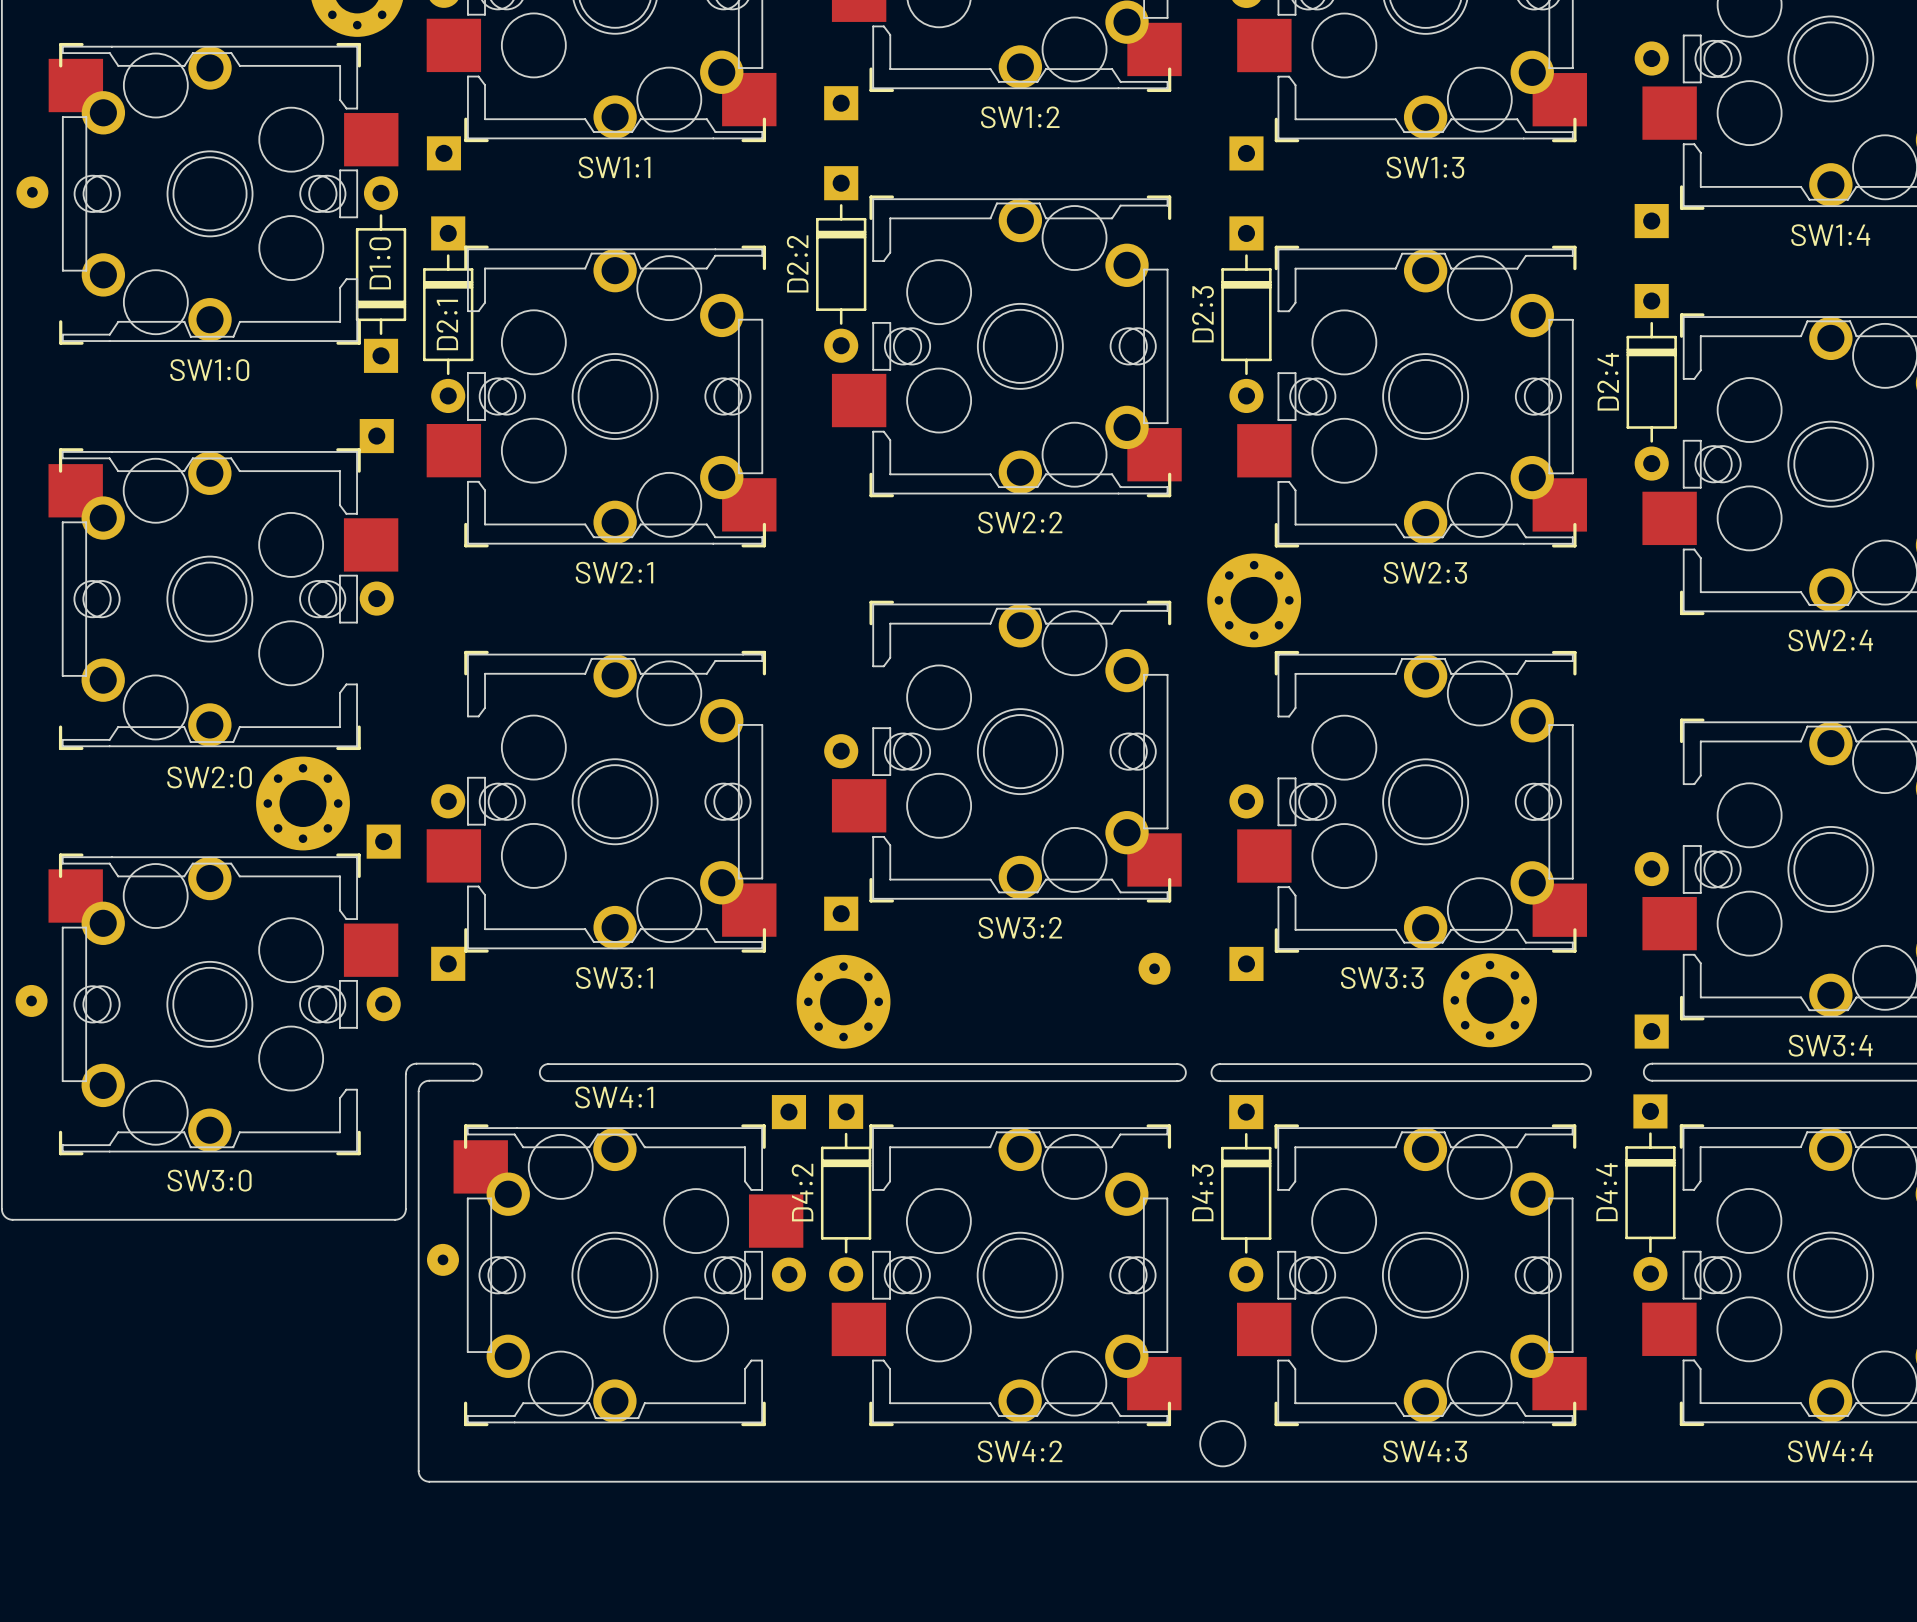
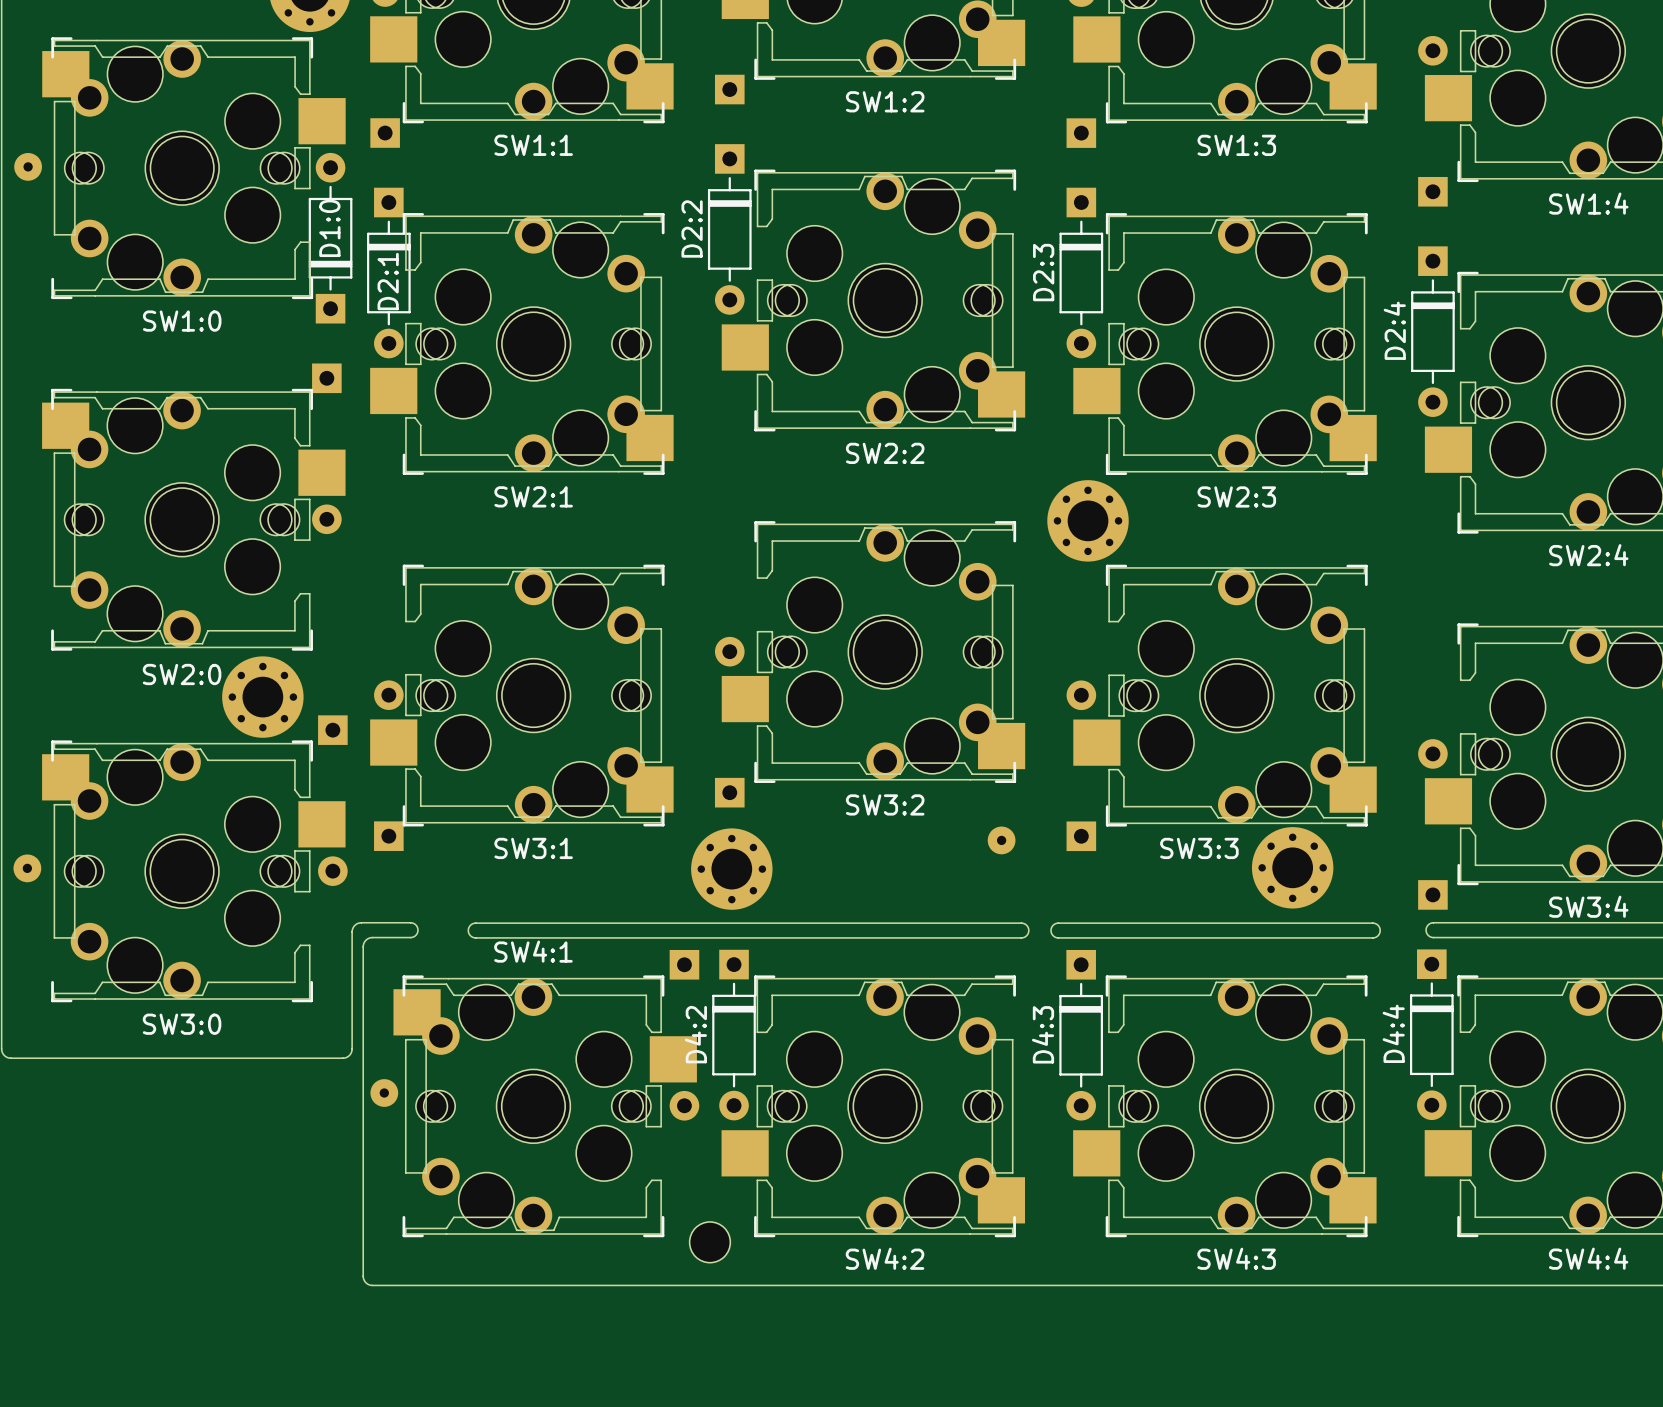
round board edge: [1199, 1420, 1246, 1467] -> none
part: none -> (709, 1242)

